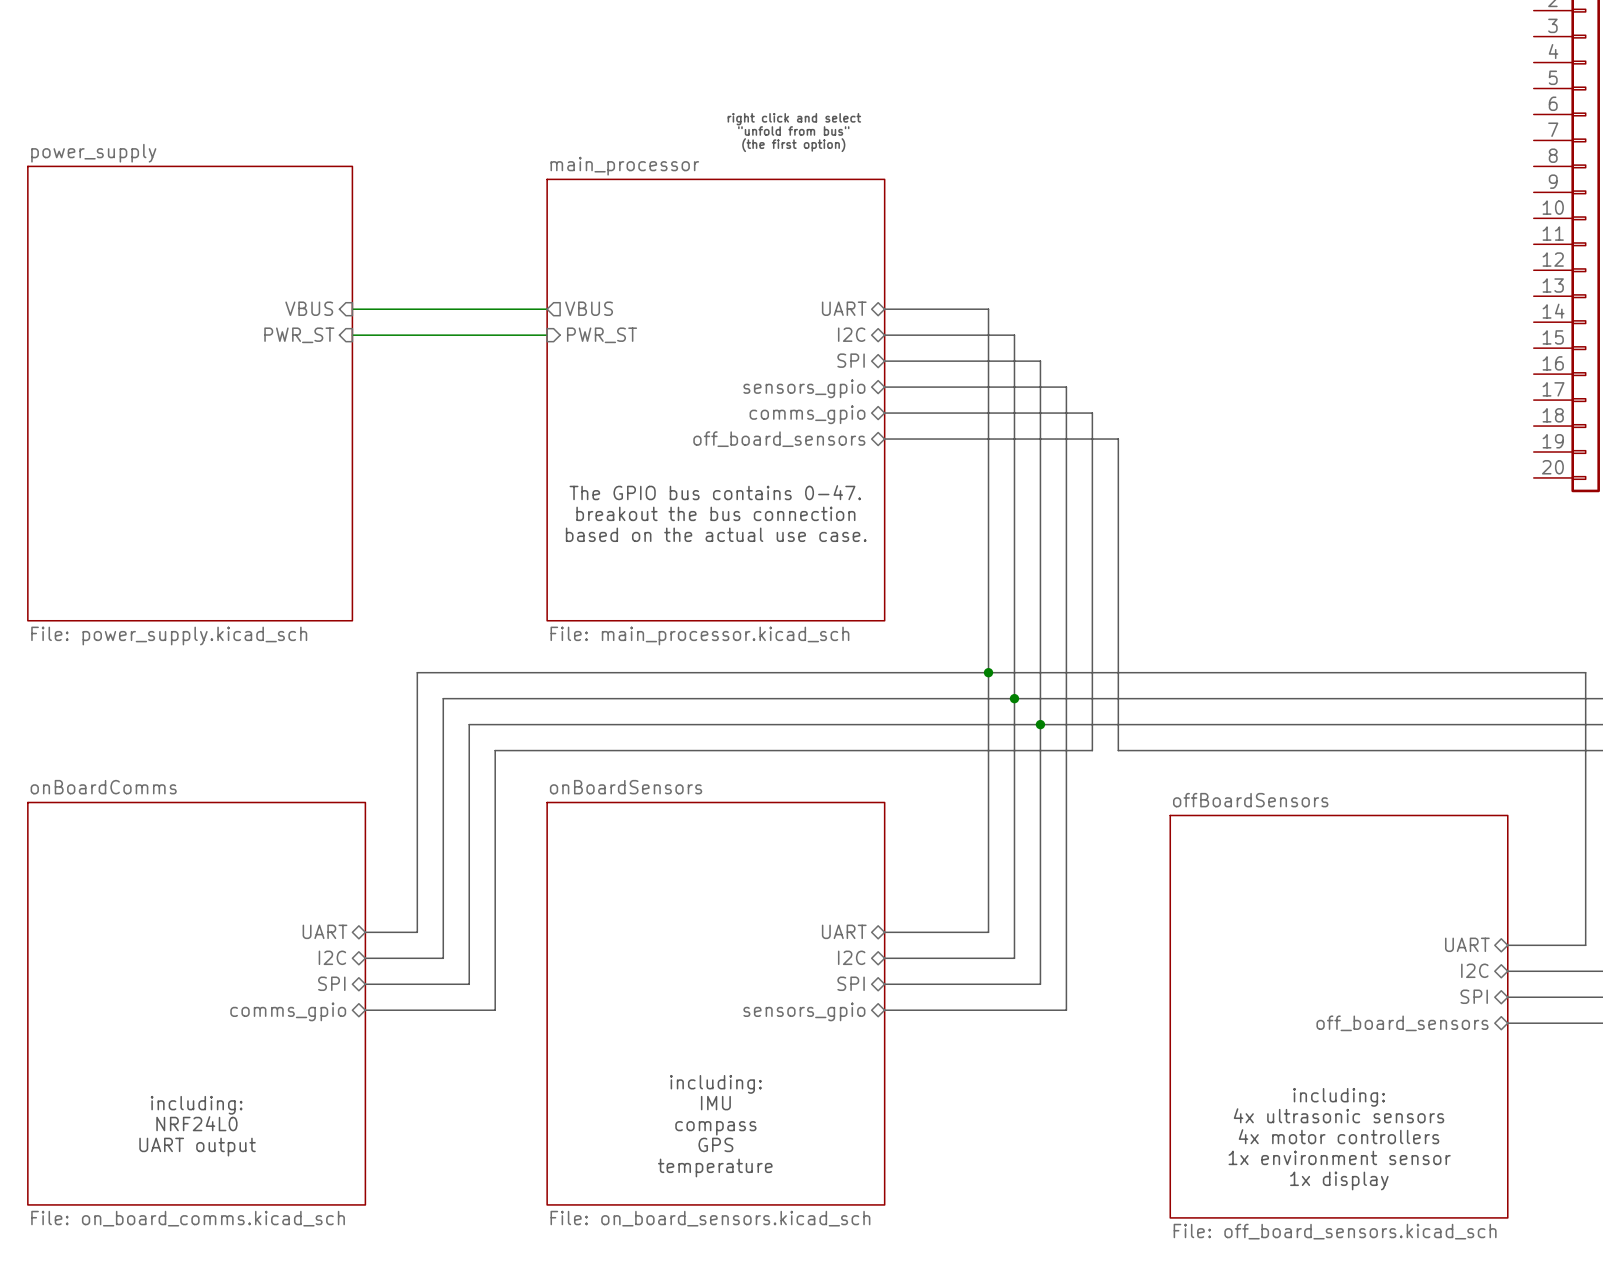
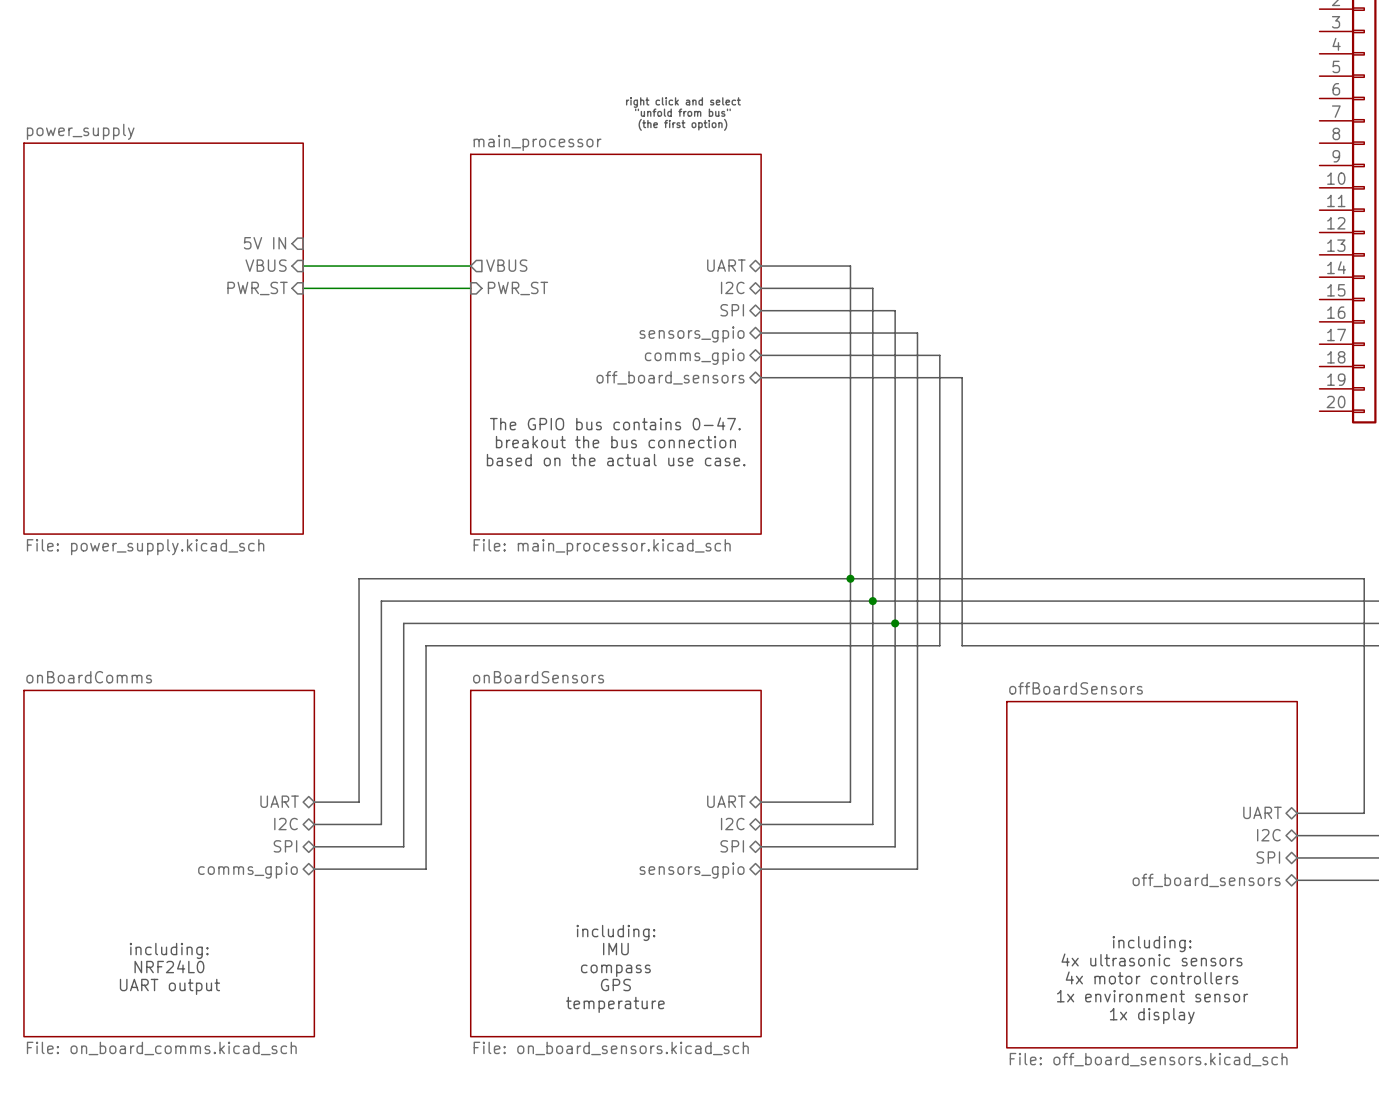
sheet pin: none -> 5V IN (264, 243)

